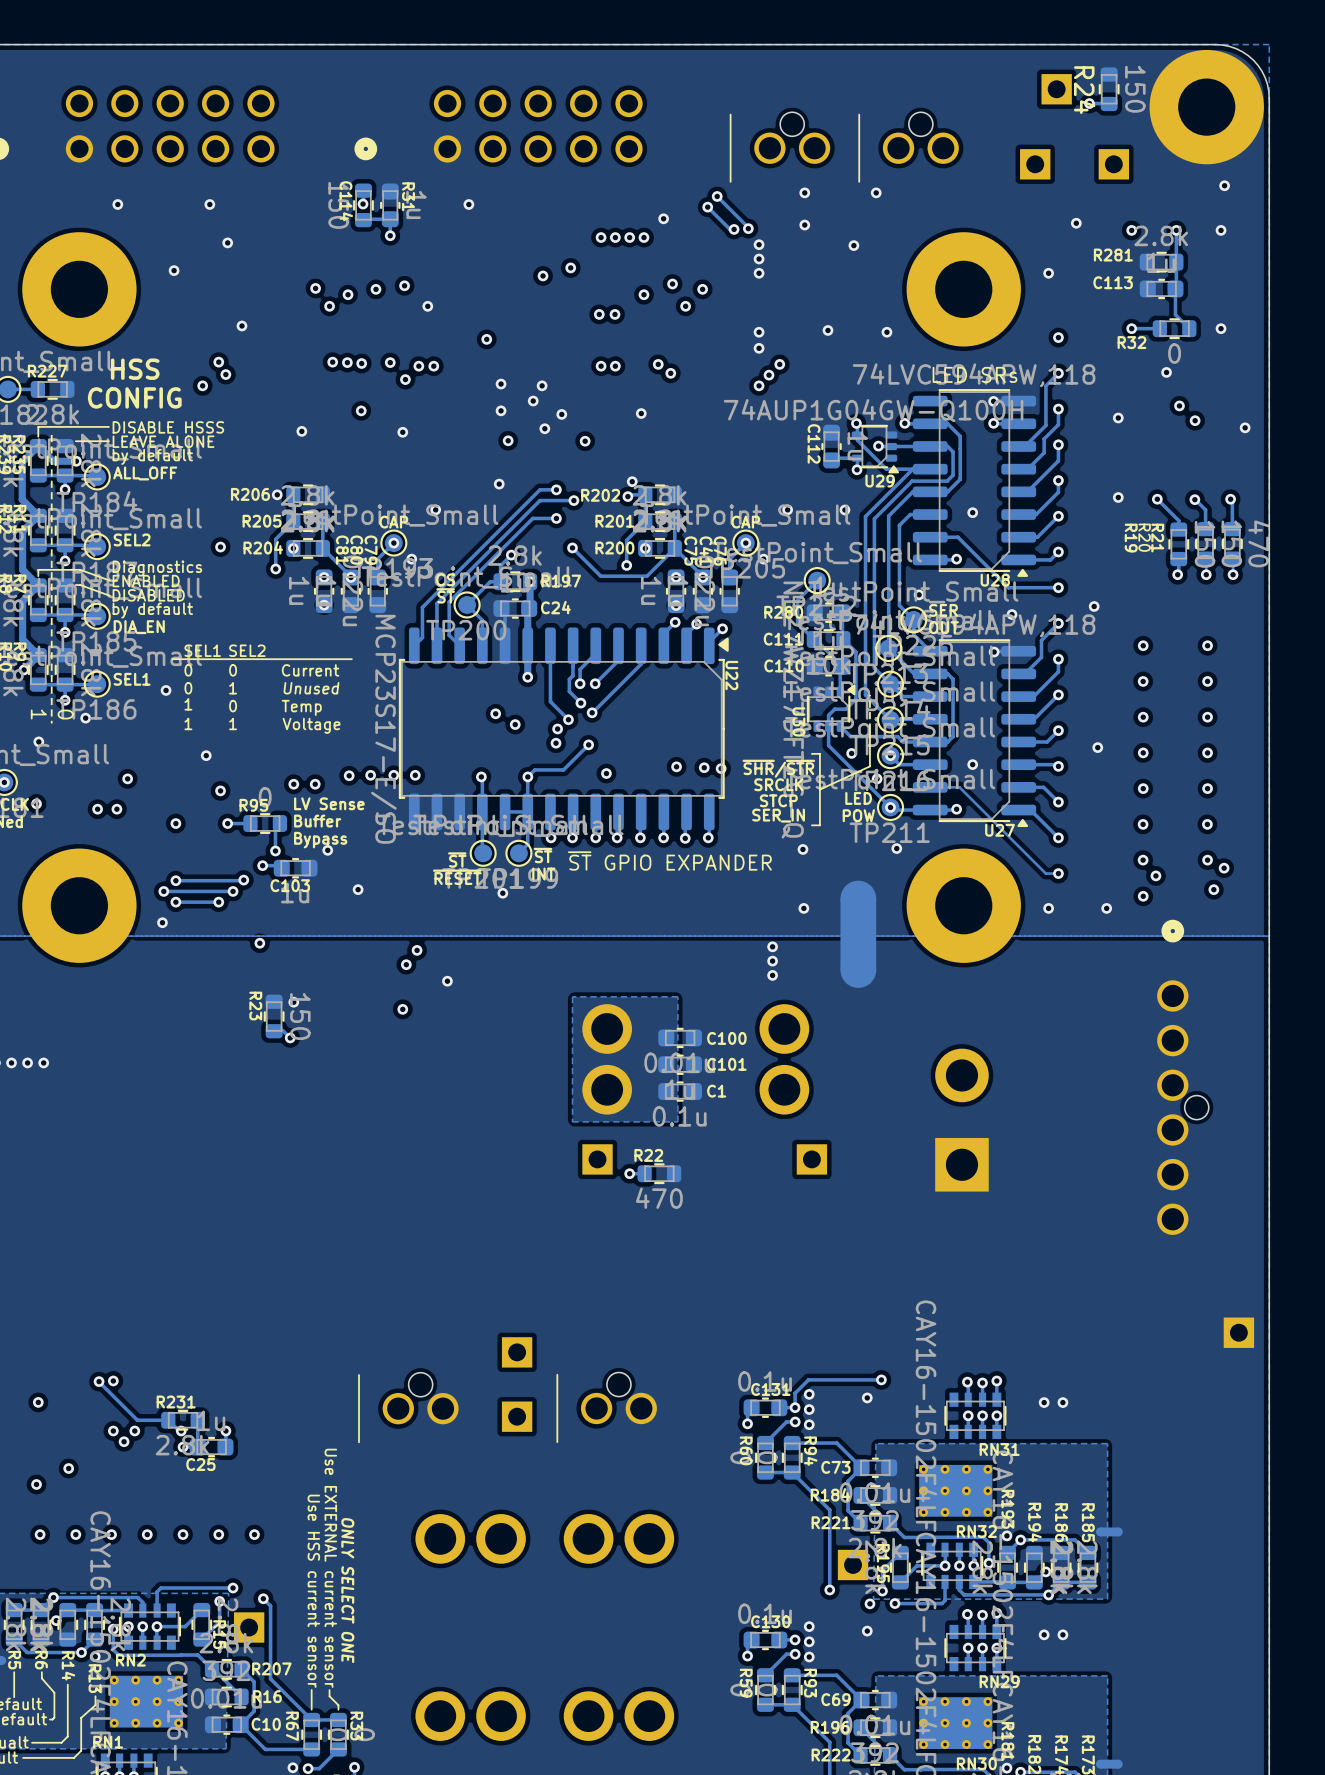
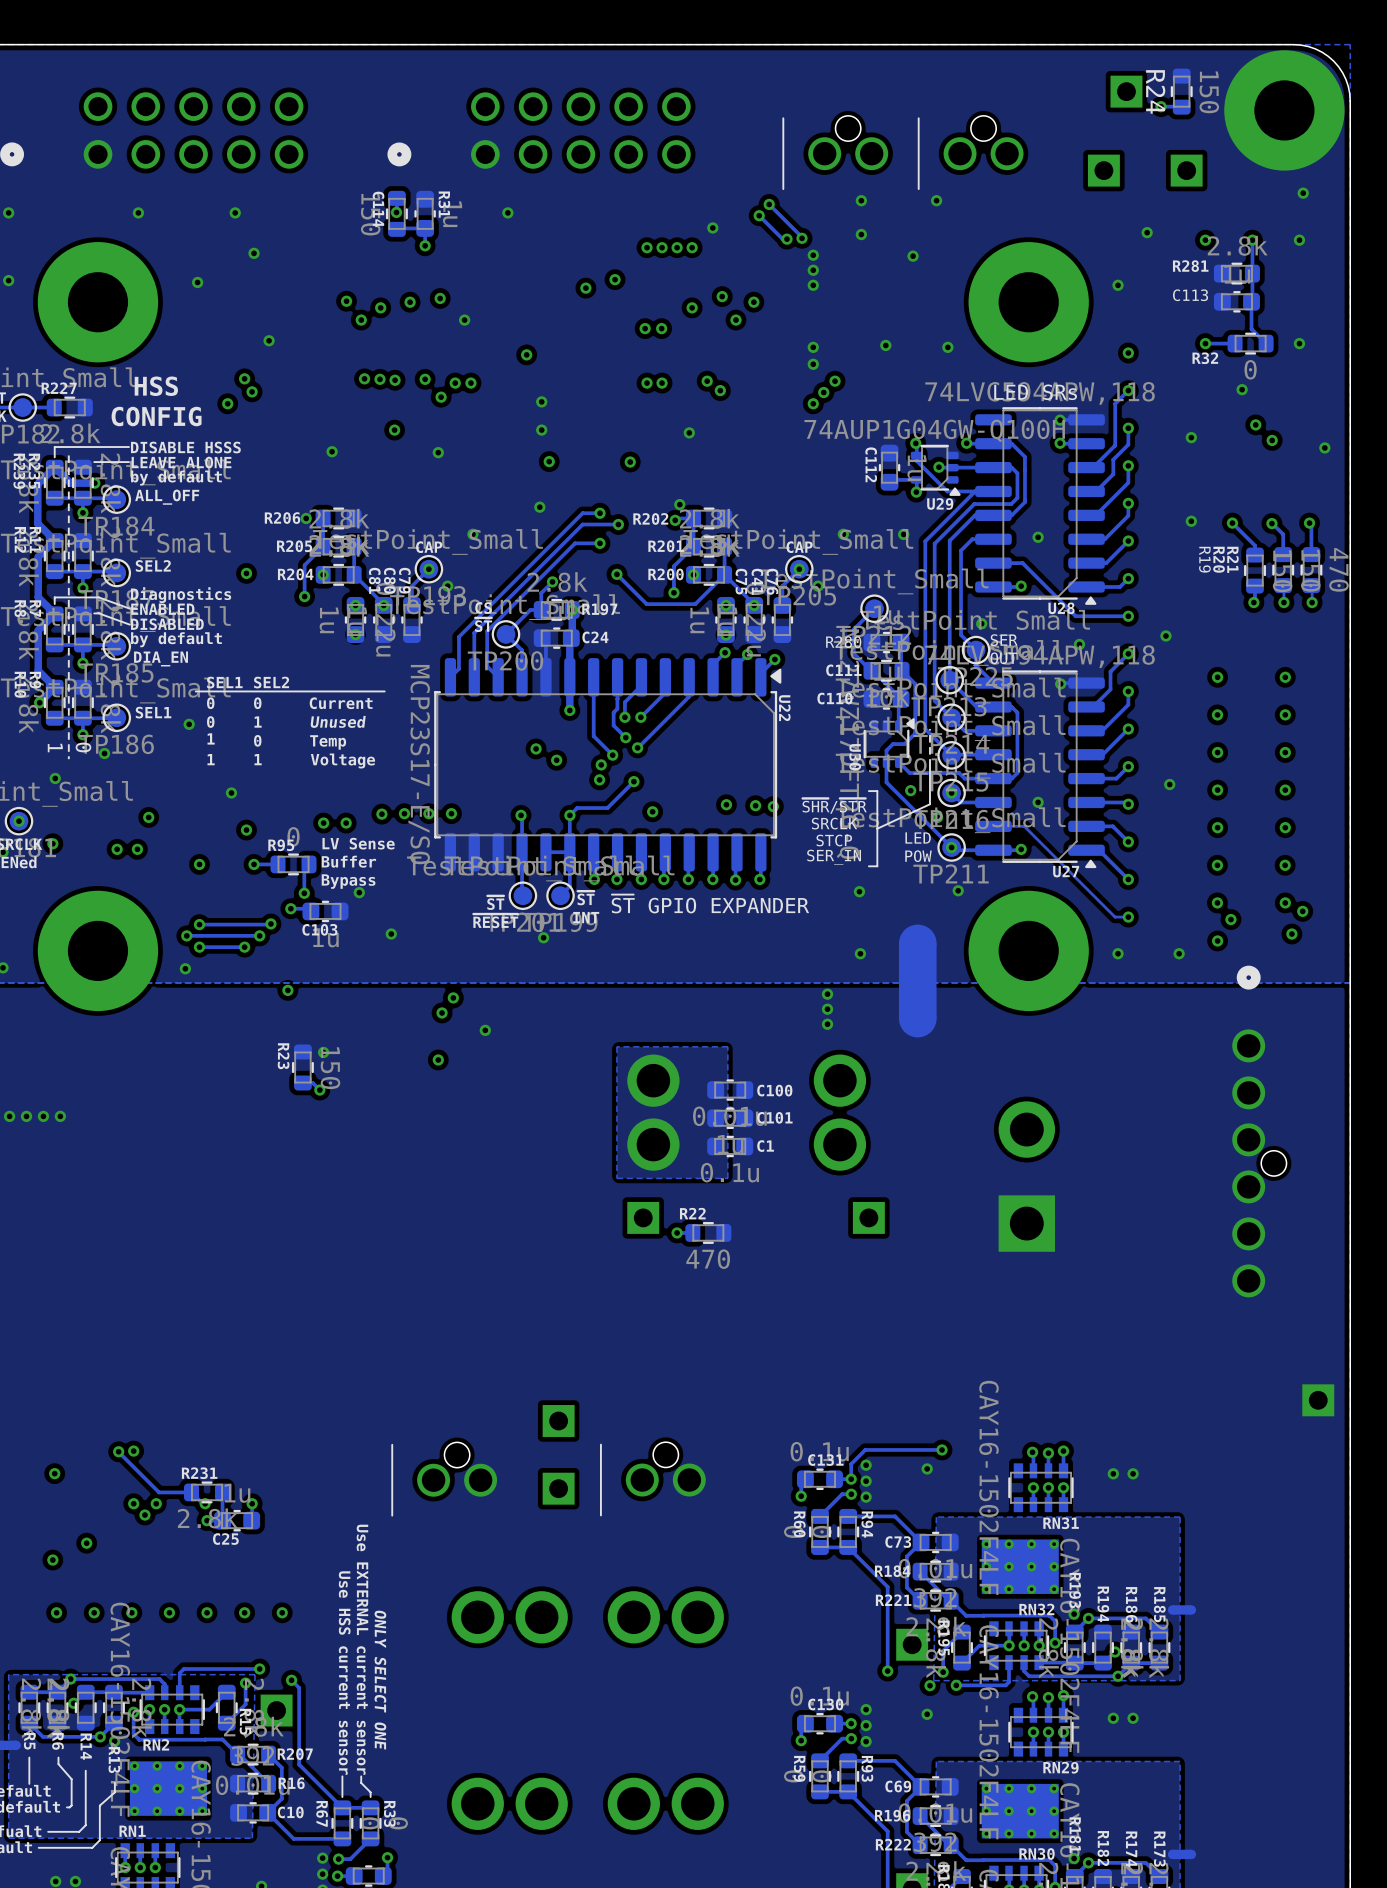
via: (542, 385) -> none
via: (533, 401) -> none
via: (561, 414) -> none
via: (544, 428) -> none

